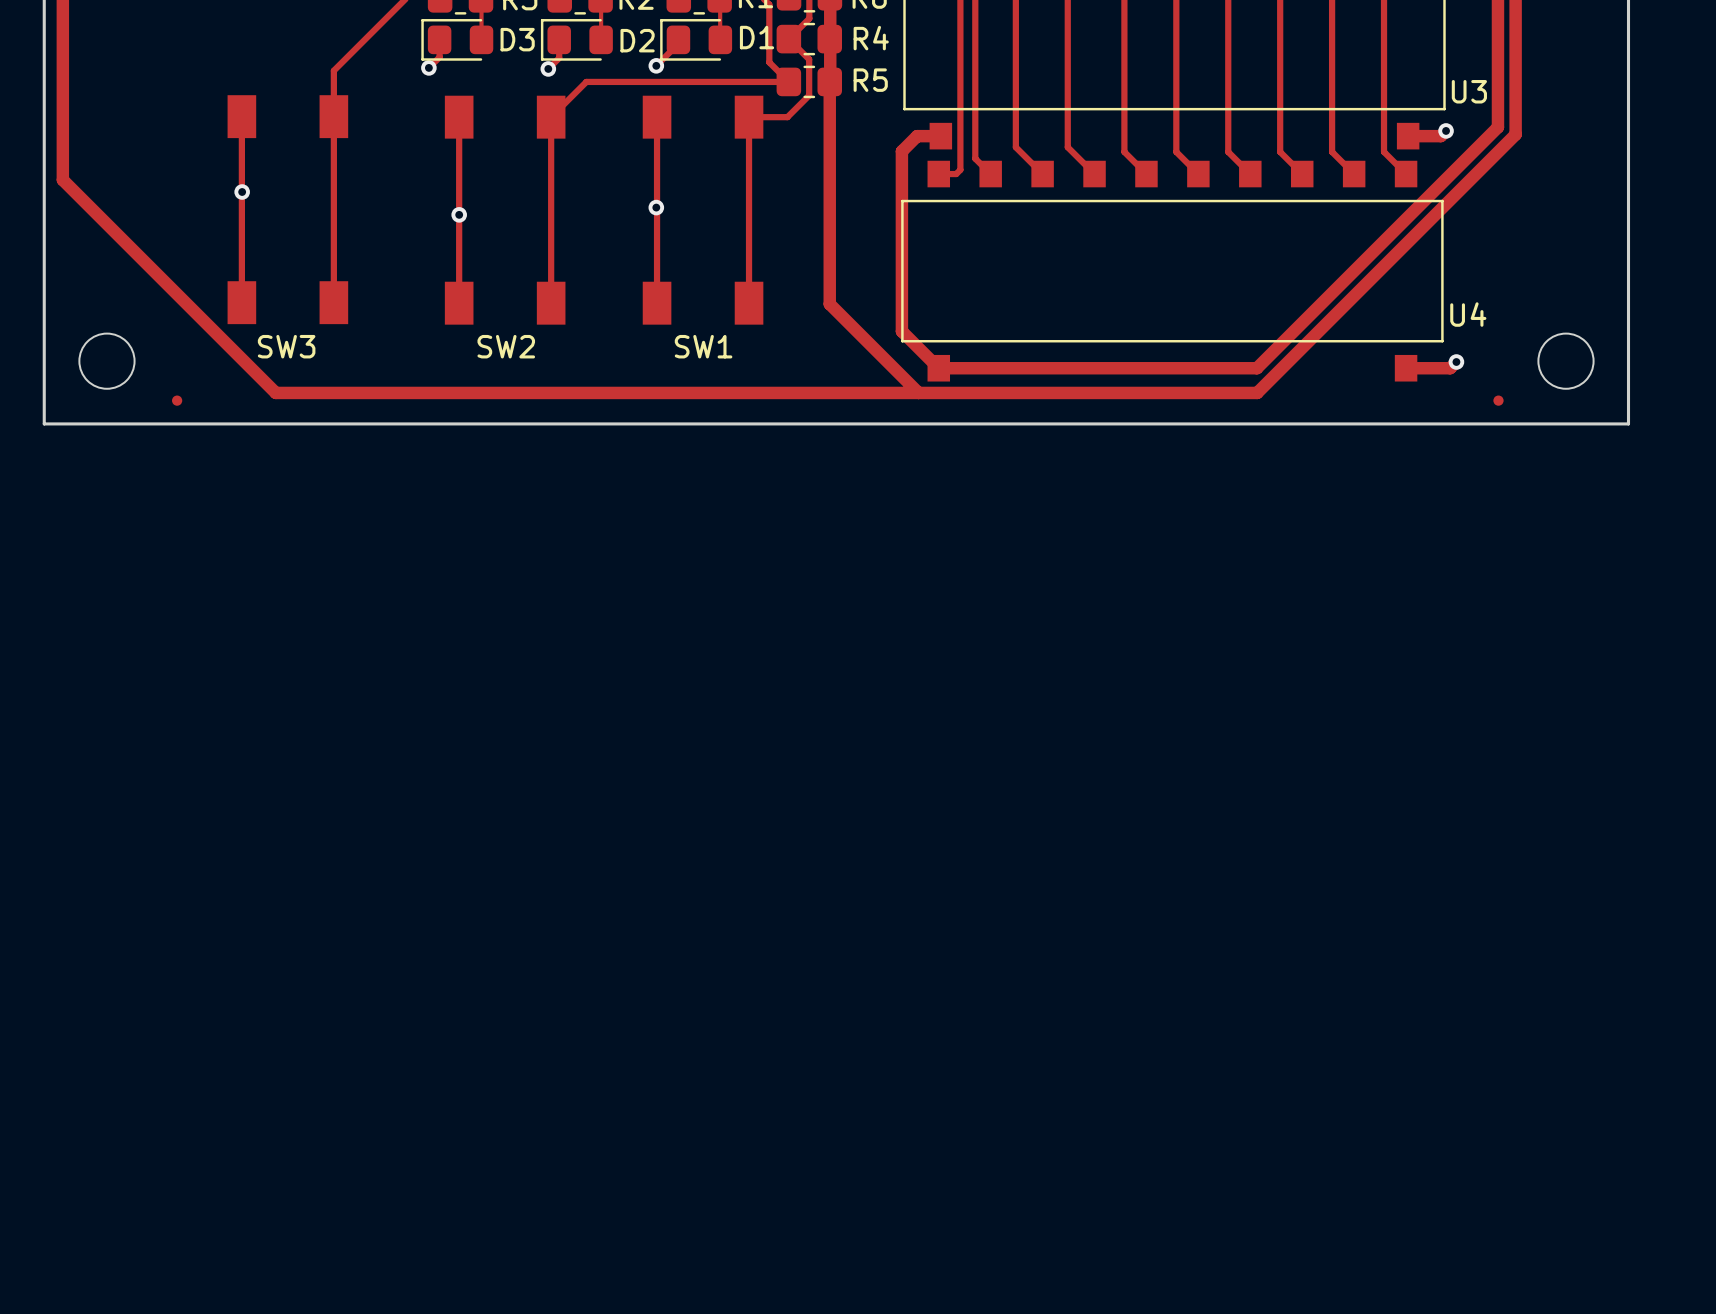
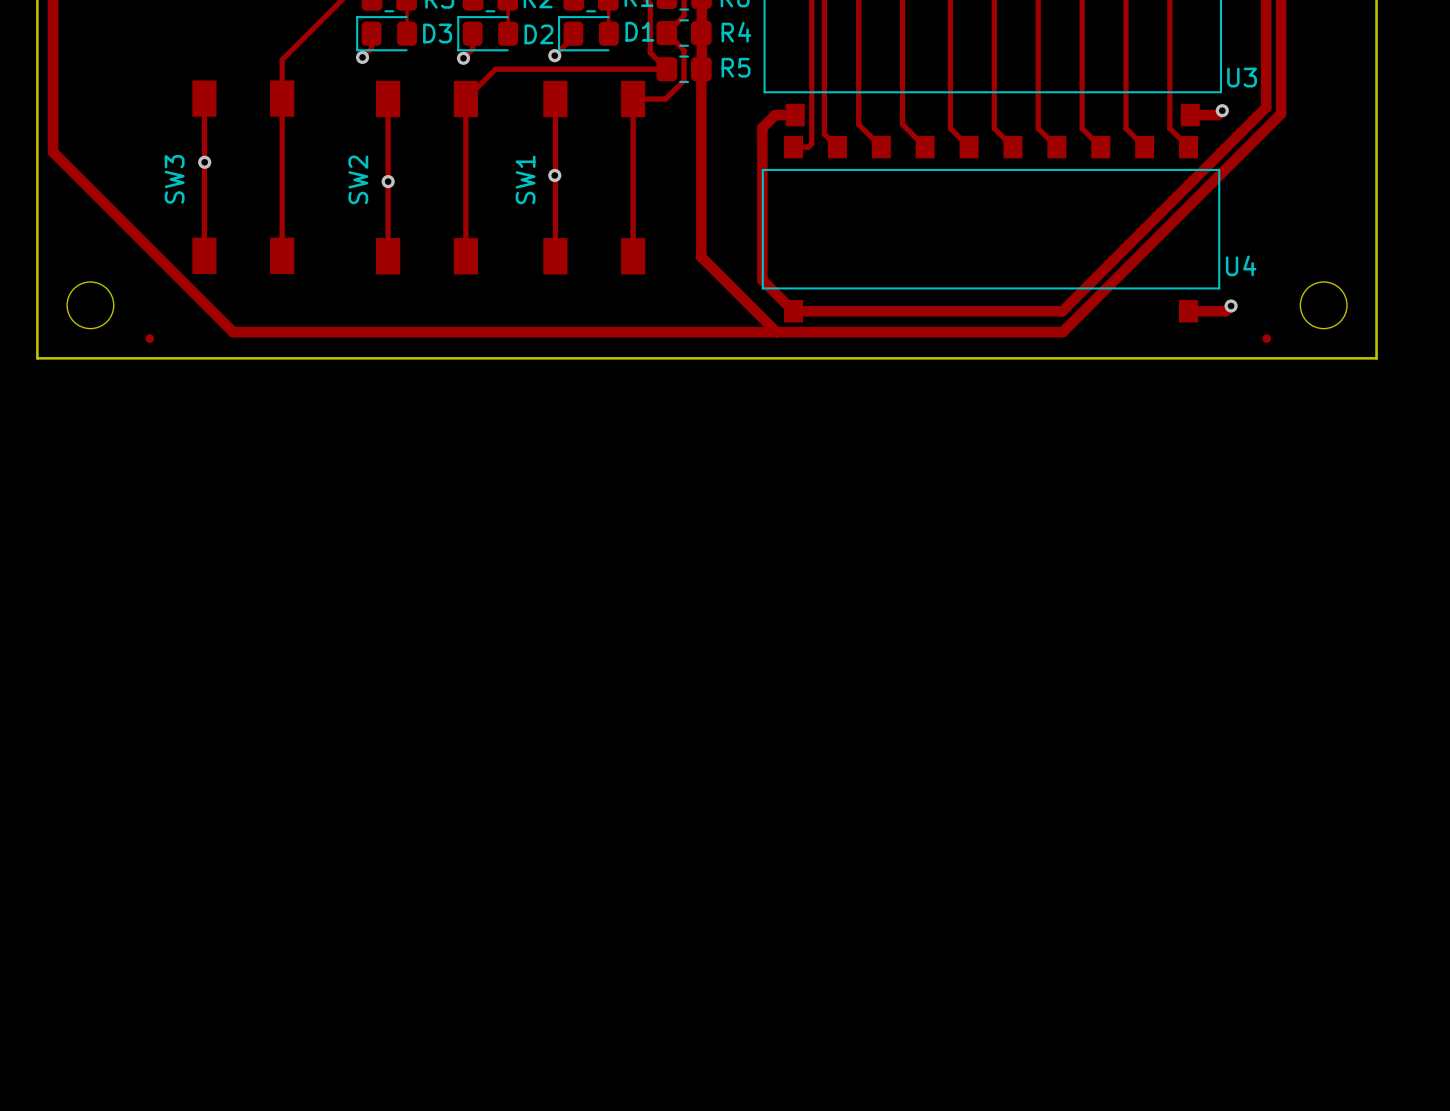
SW3 name rotation: 0° (286, 346) -> 90° counterclockwise (174, 179)
SW3 name position: SW3 (286, 346) -> SW3 (174, 179)
SW2 name rotation: 0° (506, 346) -> 90° counterclockwise (358, 179)
SW2 name position: SW2 (506, 346) -> SW2 (358, 179)
SW1 name rotation: 0° (703, 346) -> 90° counterclockwise (525, 179)
SW1 name position: SW1 (703, 346) -> SW1 (525, 179)

